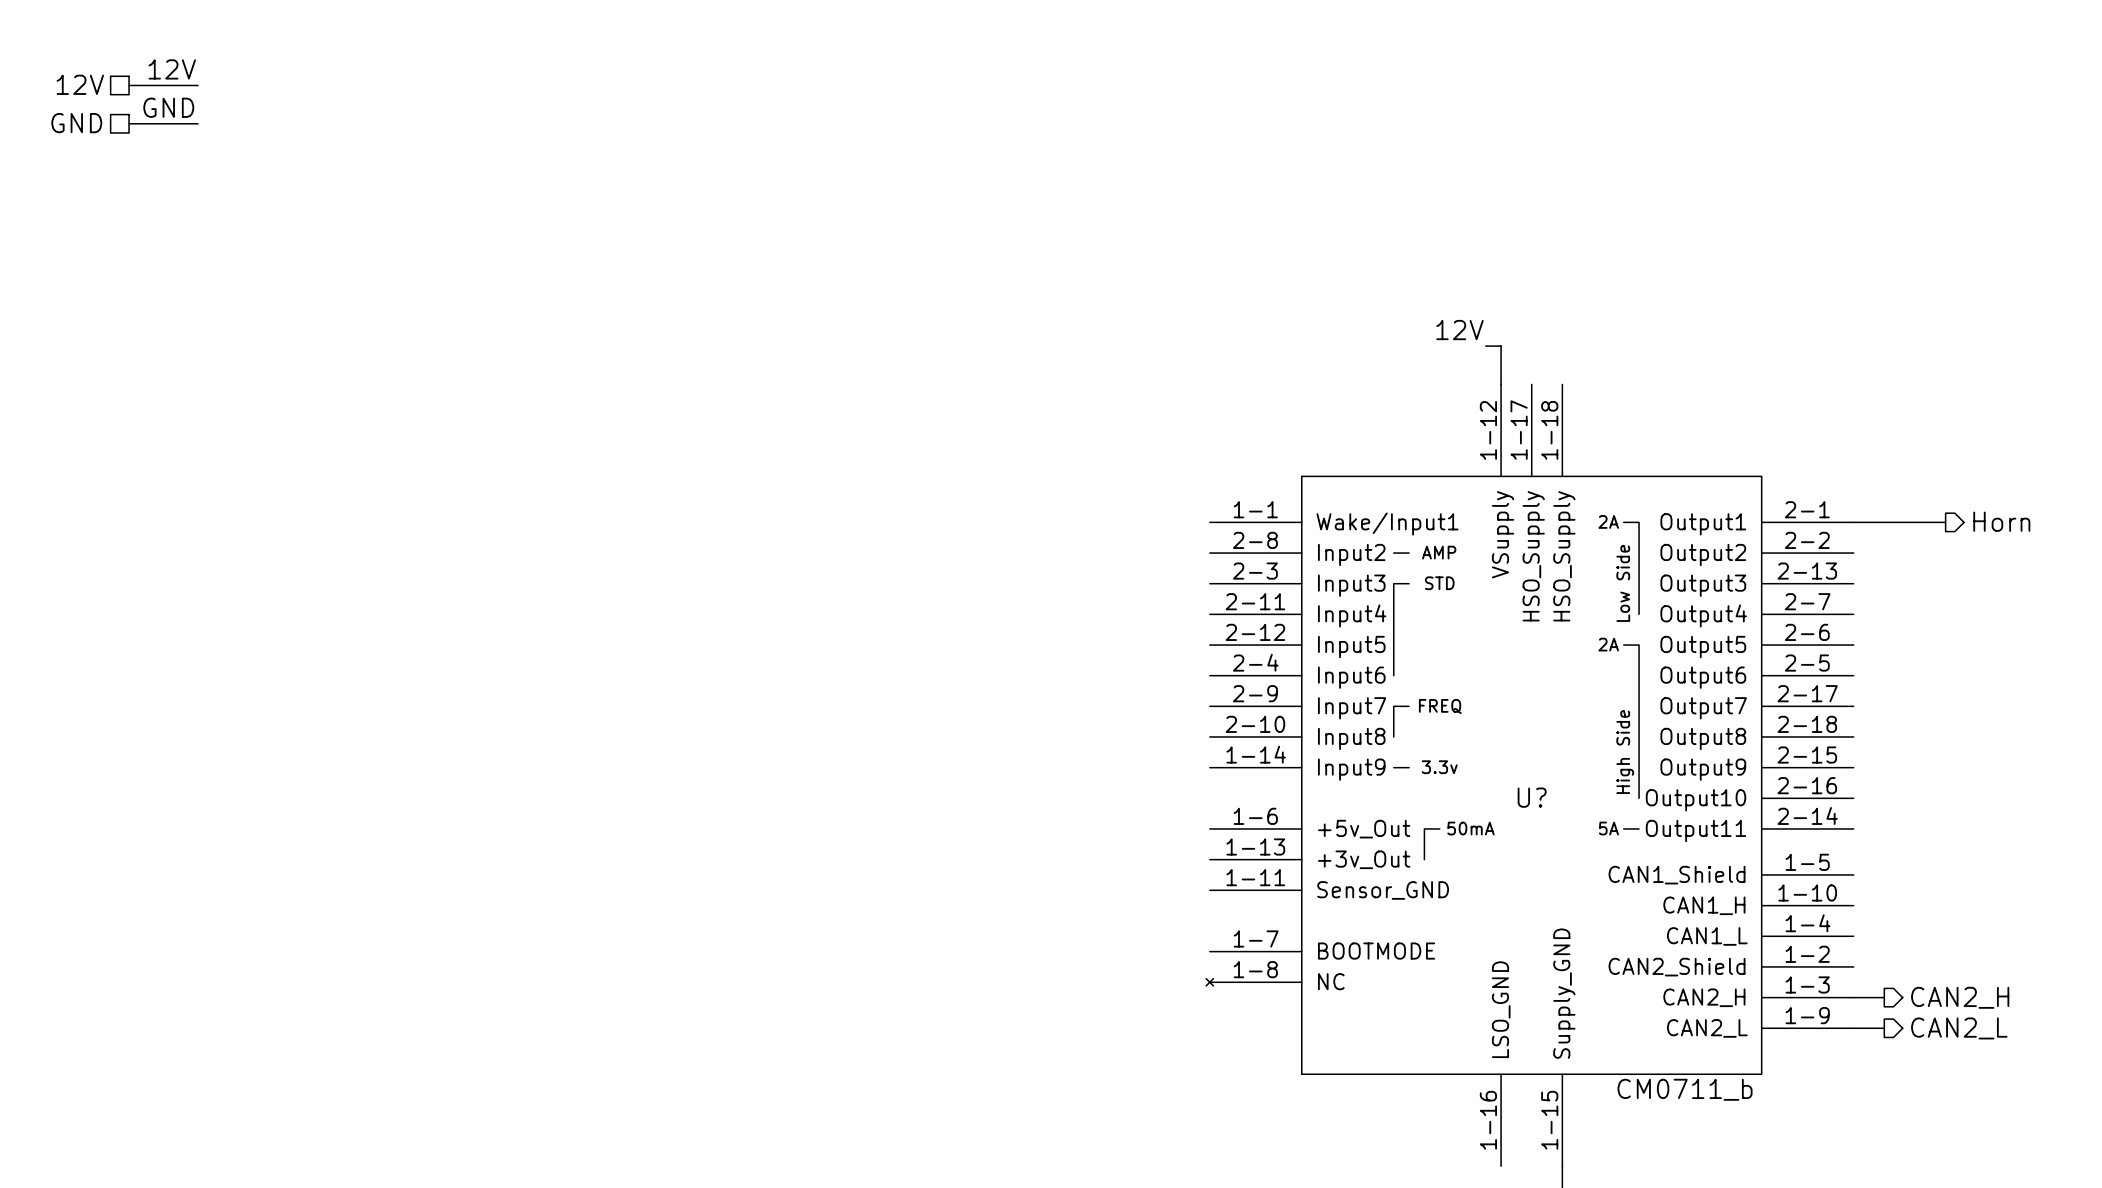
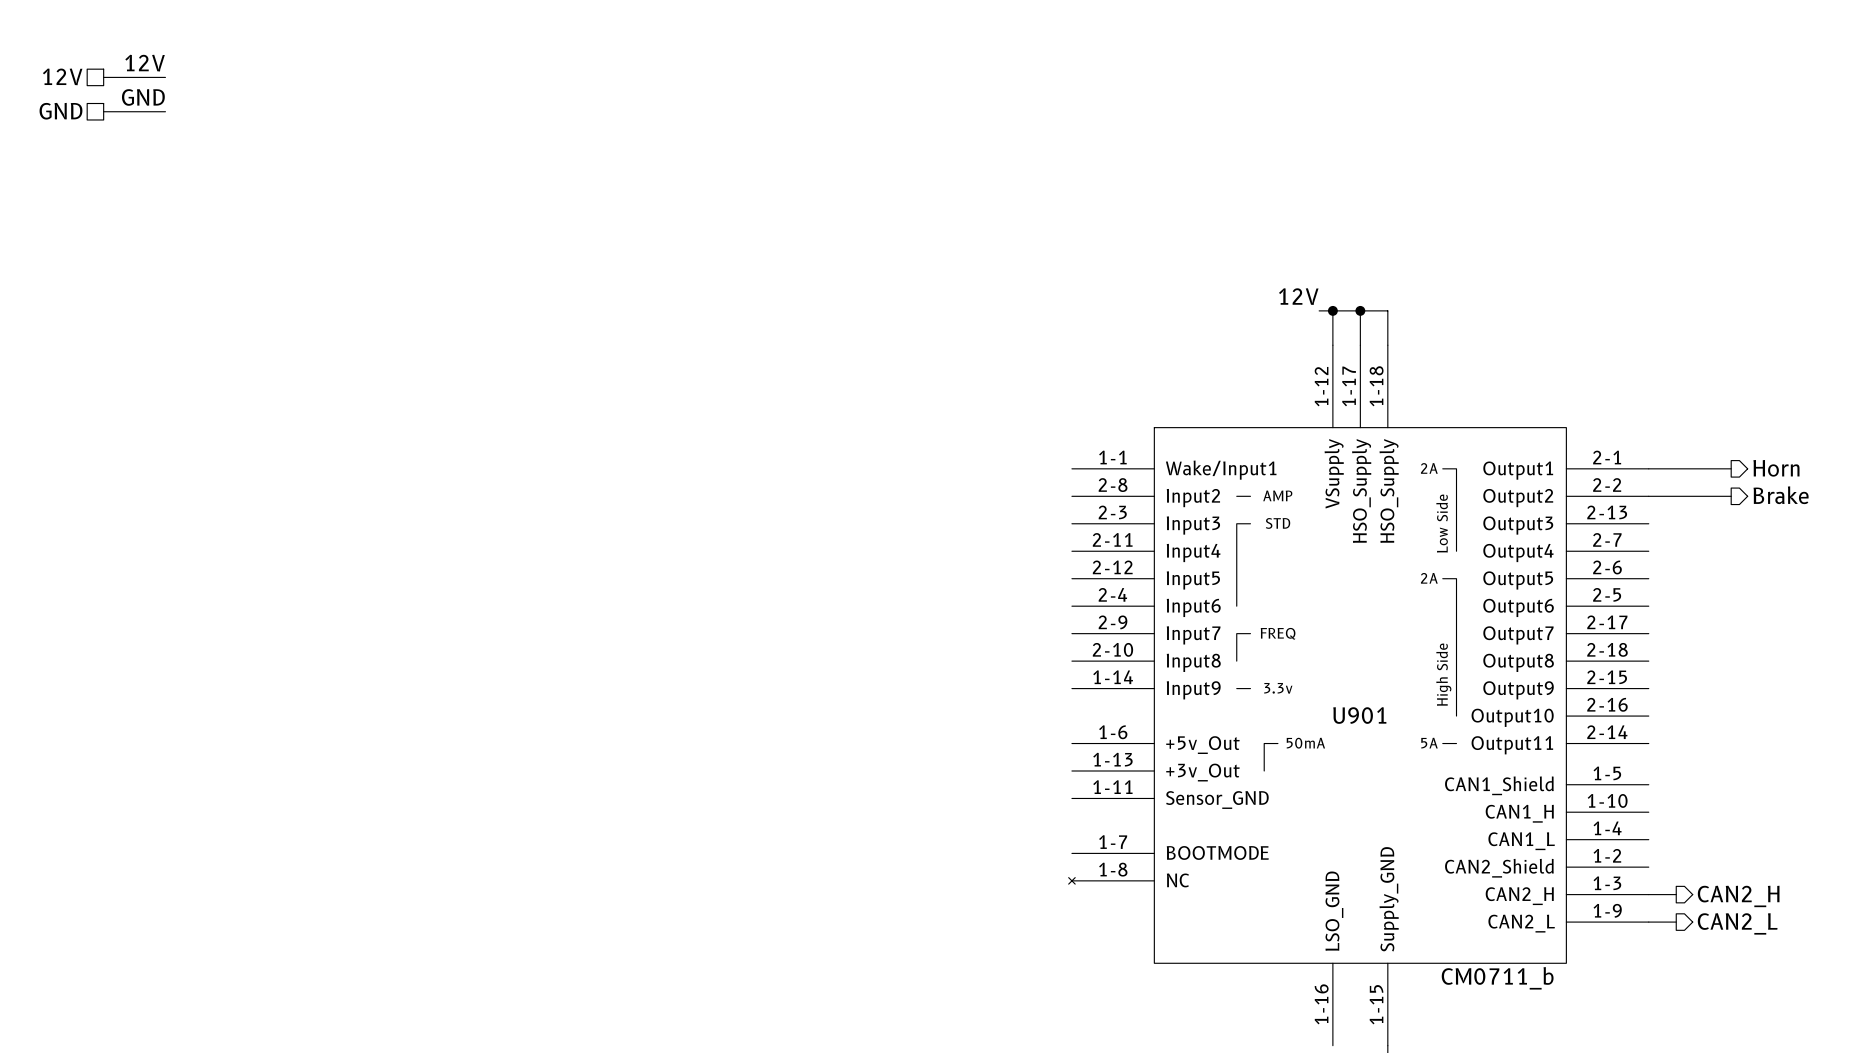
wire: none -> (1332, 310) (1387, 310) (1387, 345)
junction: none -> (1332, 310)
wire: none -> (1360, 310) (1360, 345)
junction: none -> (1360, 310)
hierarchical label: none -> Brake (1781, 495)
wire: none -> (1648, 496) (1731, 496)
U? name: U? (1532, 797) -> U901 (1359, 715)

